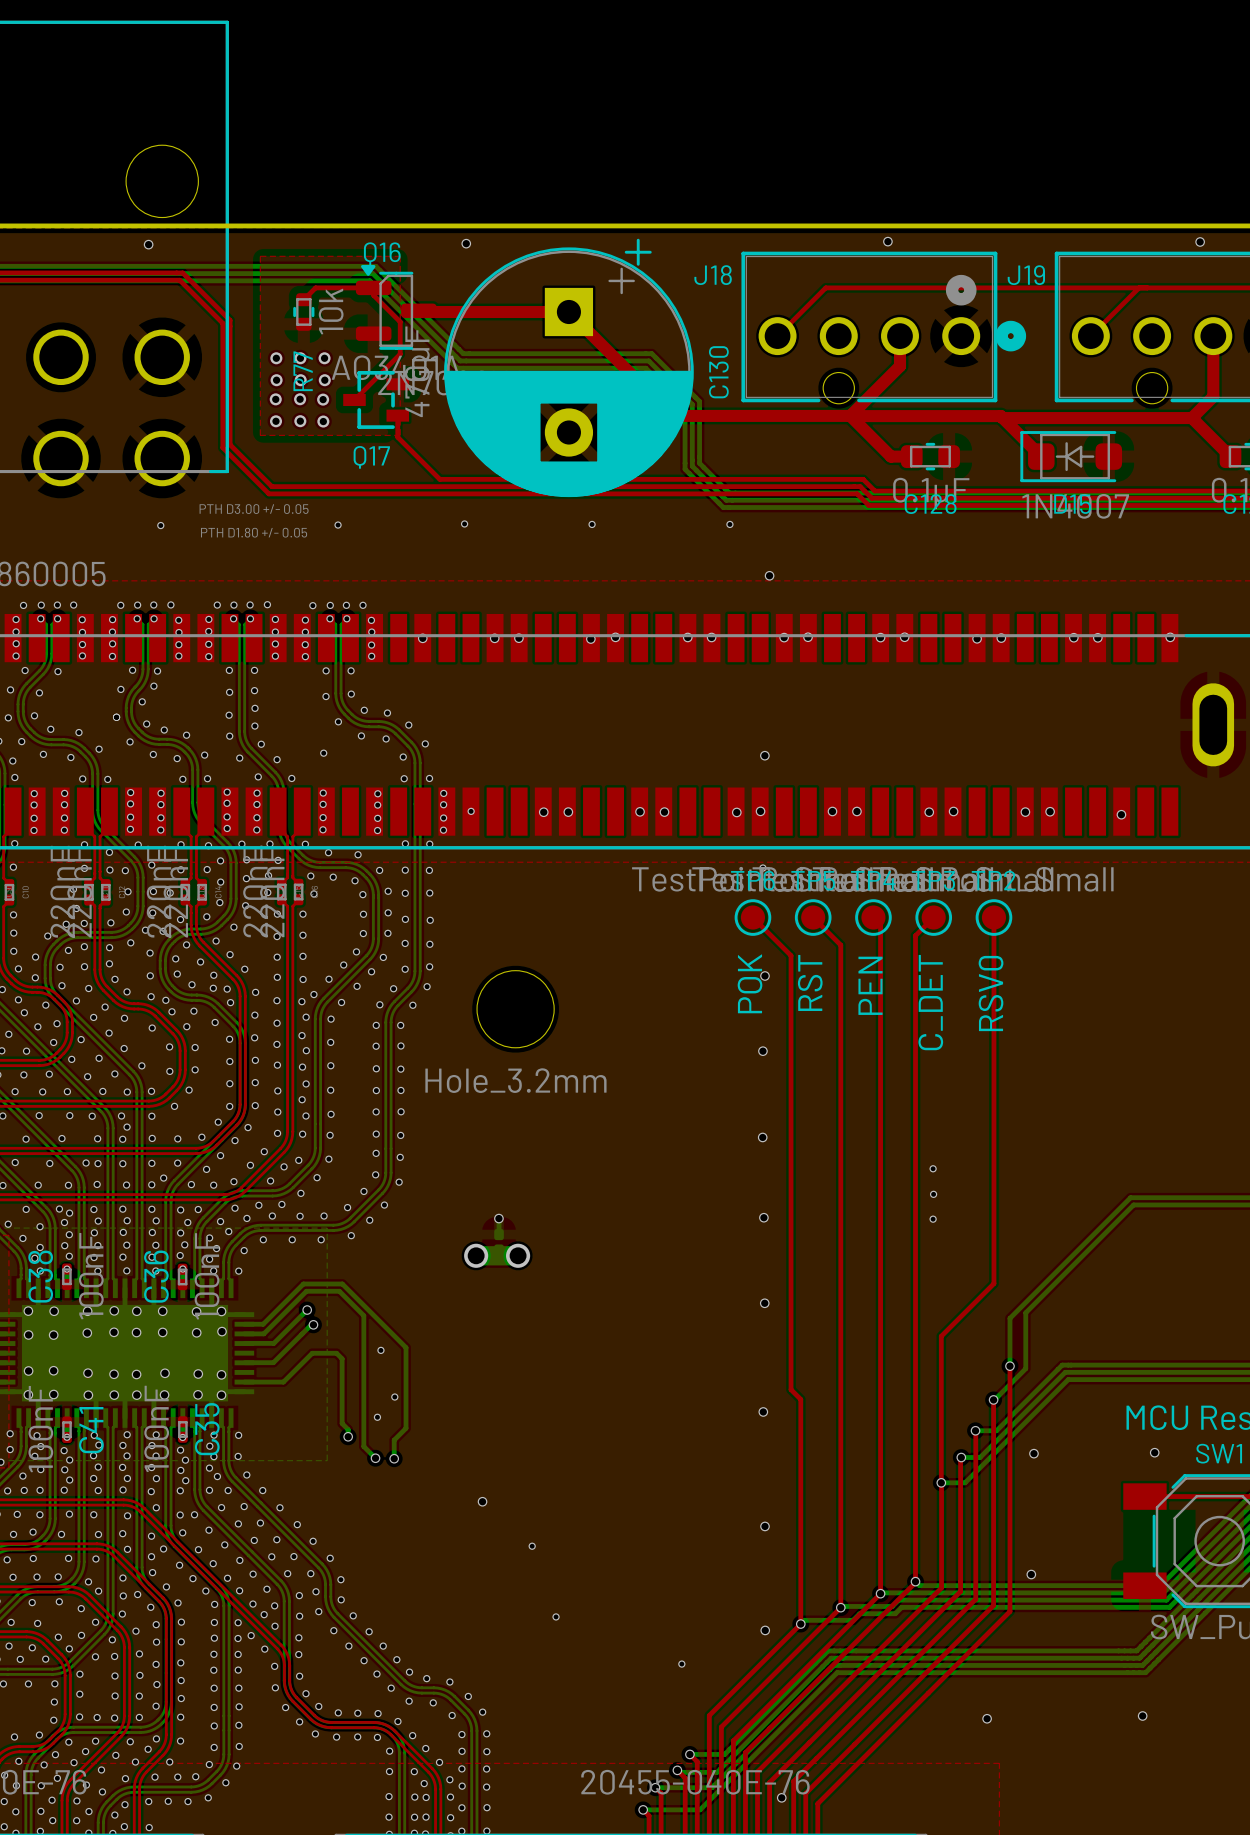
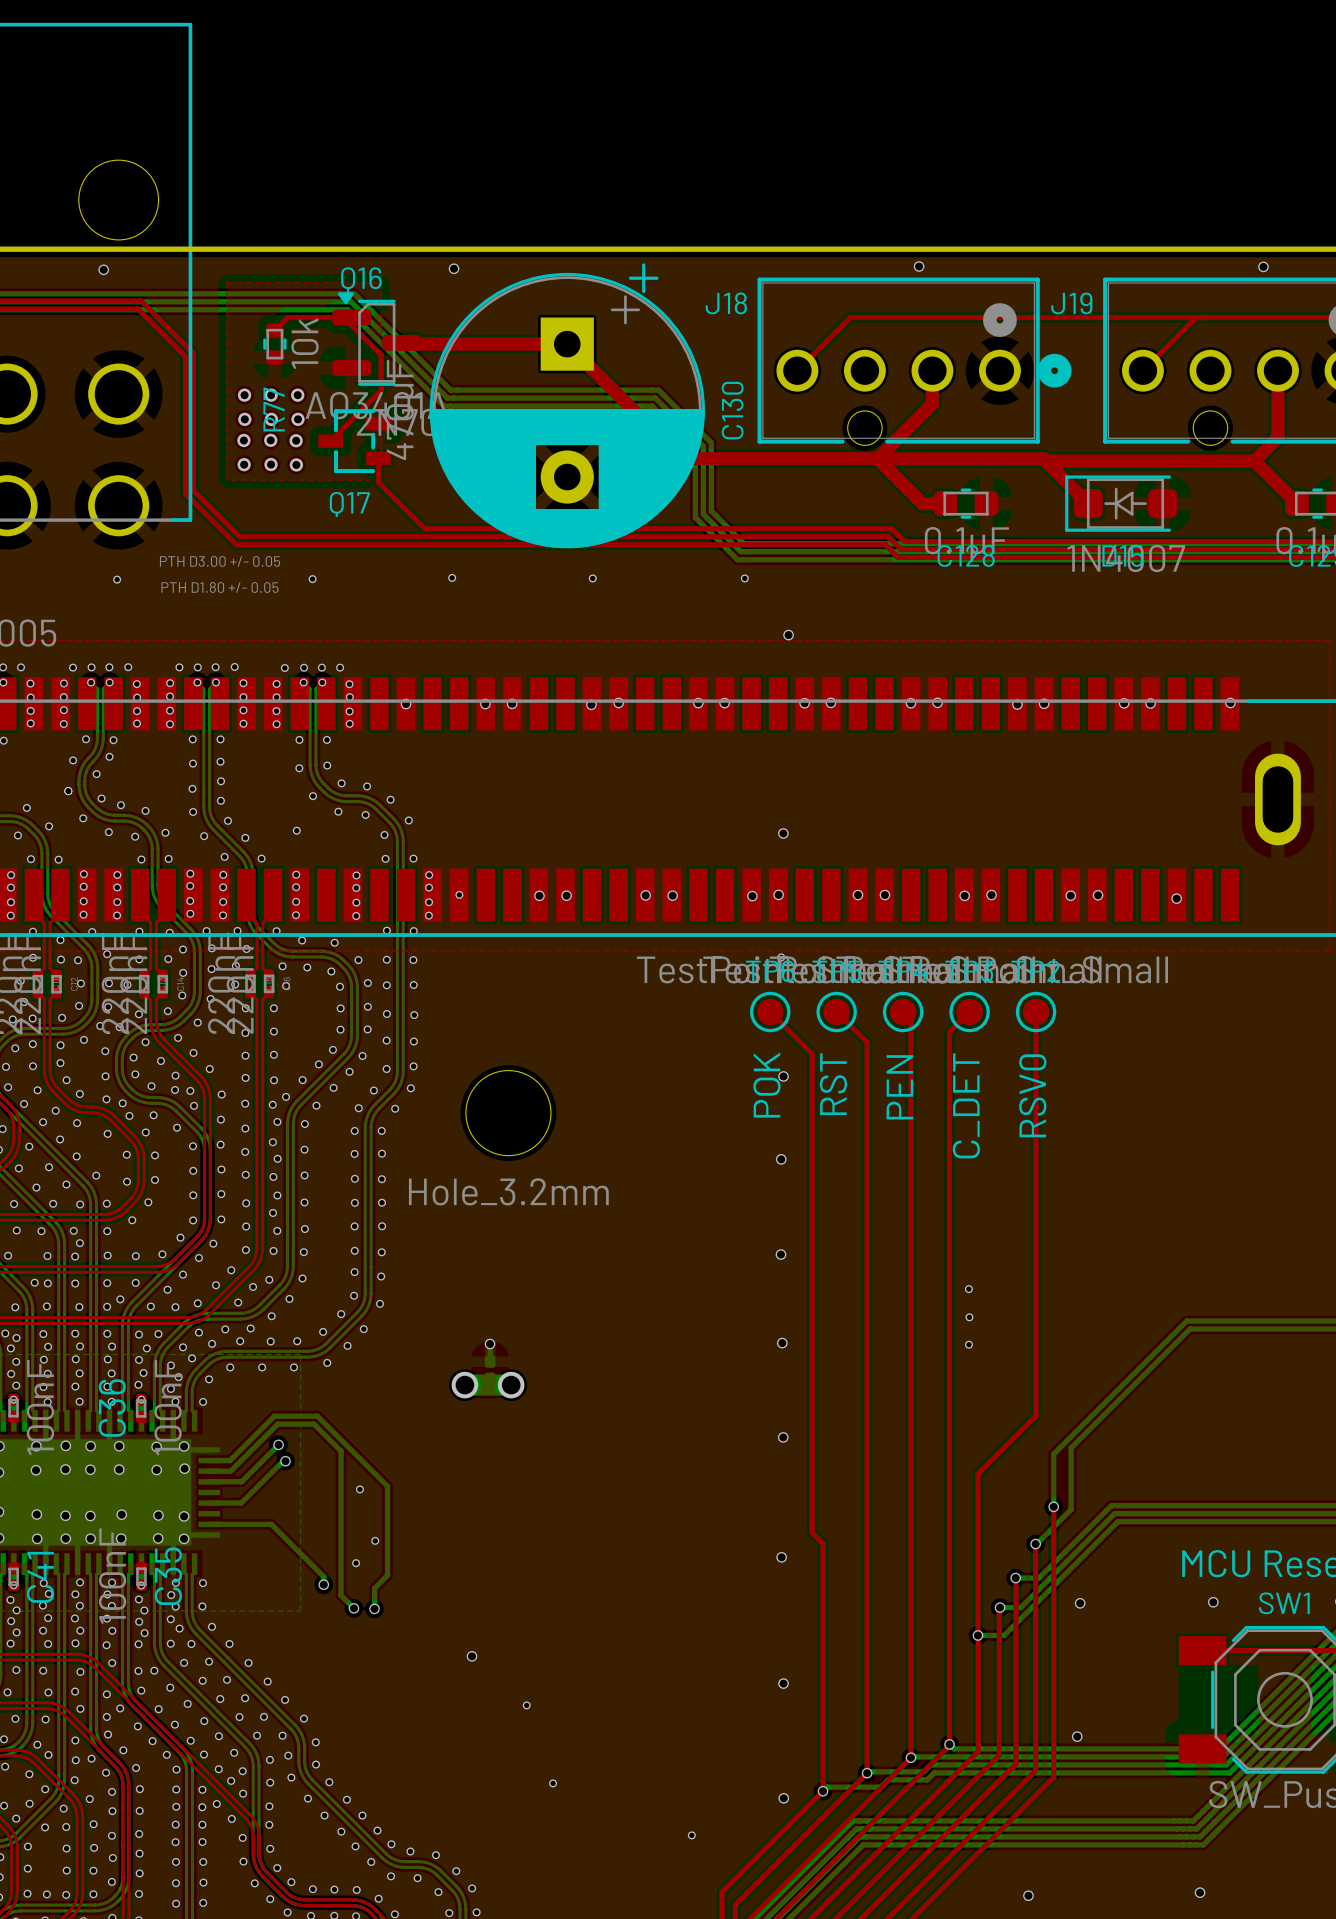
bottom track: (283, 1382) (312, 1353) (336, 1353) (342, 1358) (342, 1423) -> (252, 1524) (271, 1524) (317, 1570)

